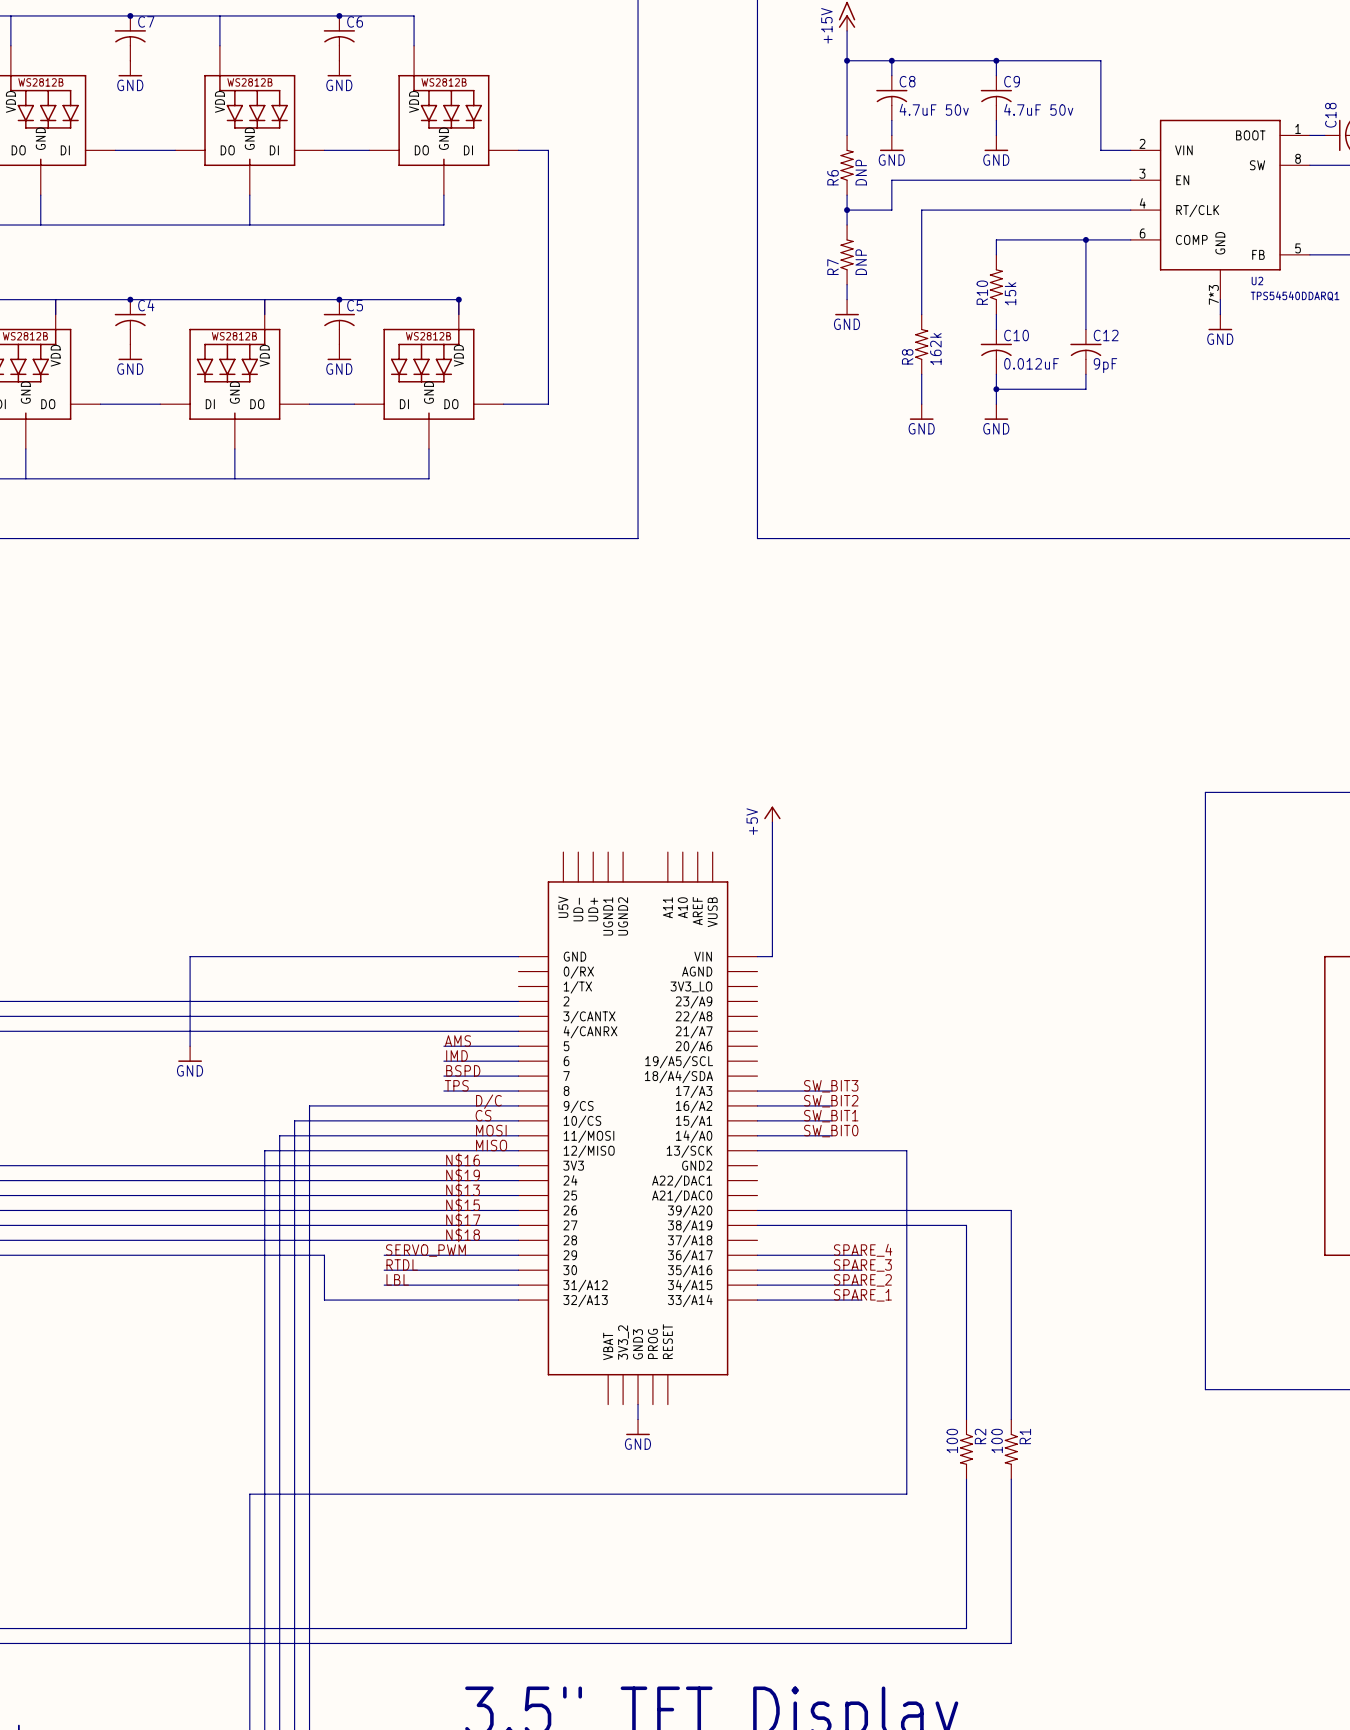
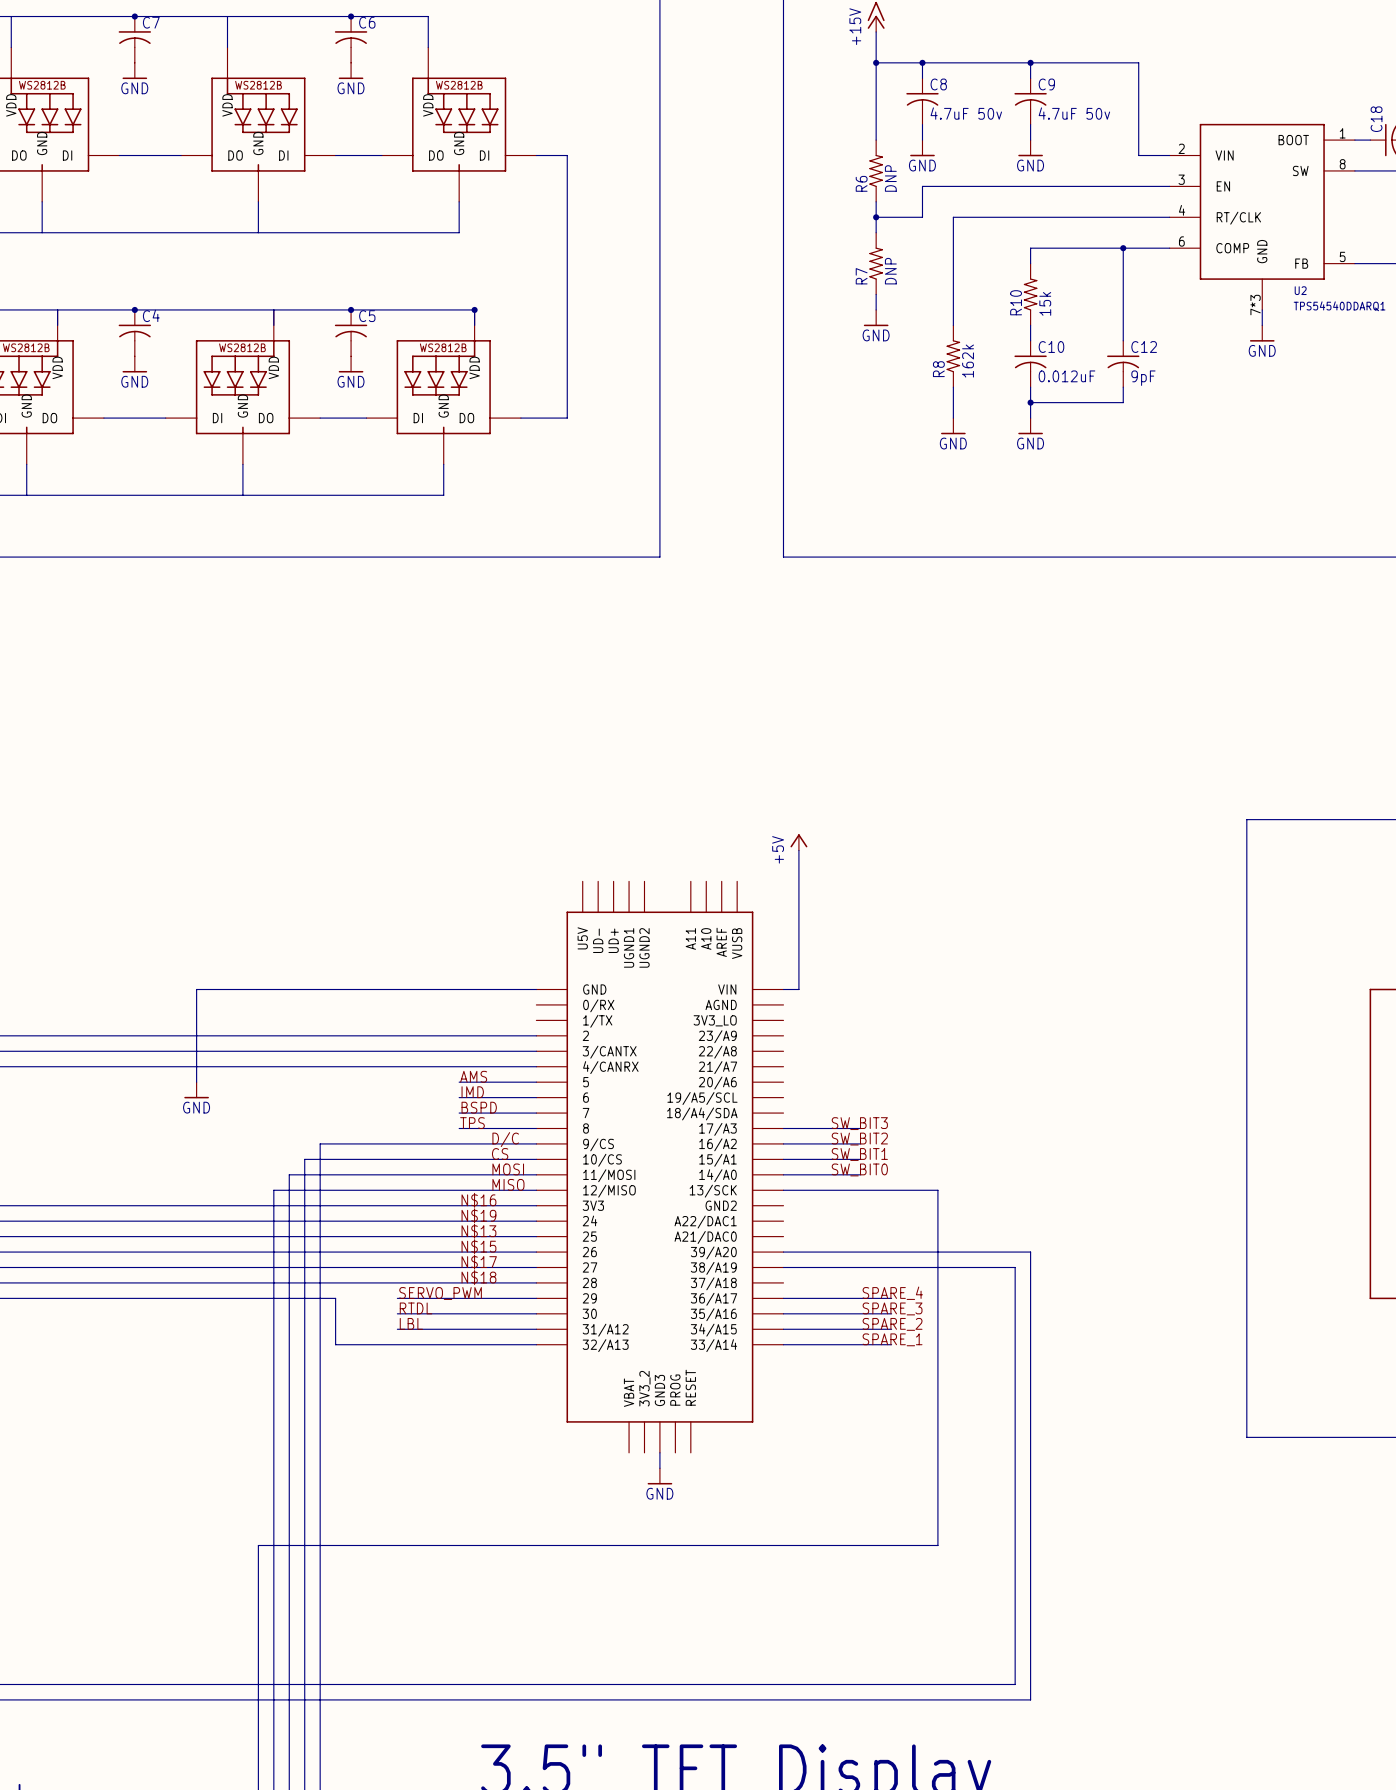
wire: (996, 1210) (1011, 1210) (1011, 1419) -> (1030, 1252) (1030, 1699)
wire: (966, 1225) (966, 1419) -> (999, 1267) (1015, 1267) (1015, 1684) (999, 1684)
R2: 100 (966, 1449) -> none
R1: 100 (1011, 1449) -> none
wire: (966, 1479) (966, 1628) -> none
wire: (1011, 1479) (1011, 1643) (996, 1643) -> none

